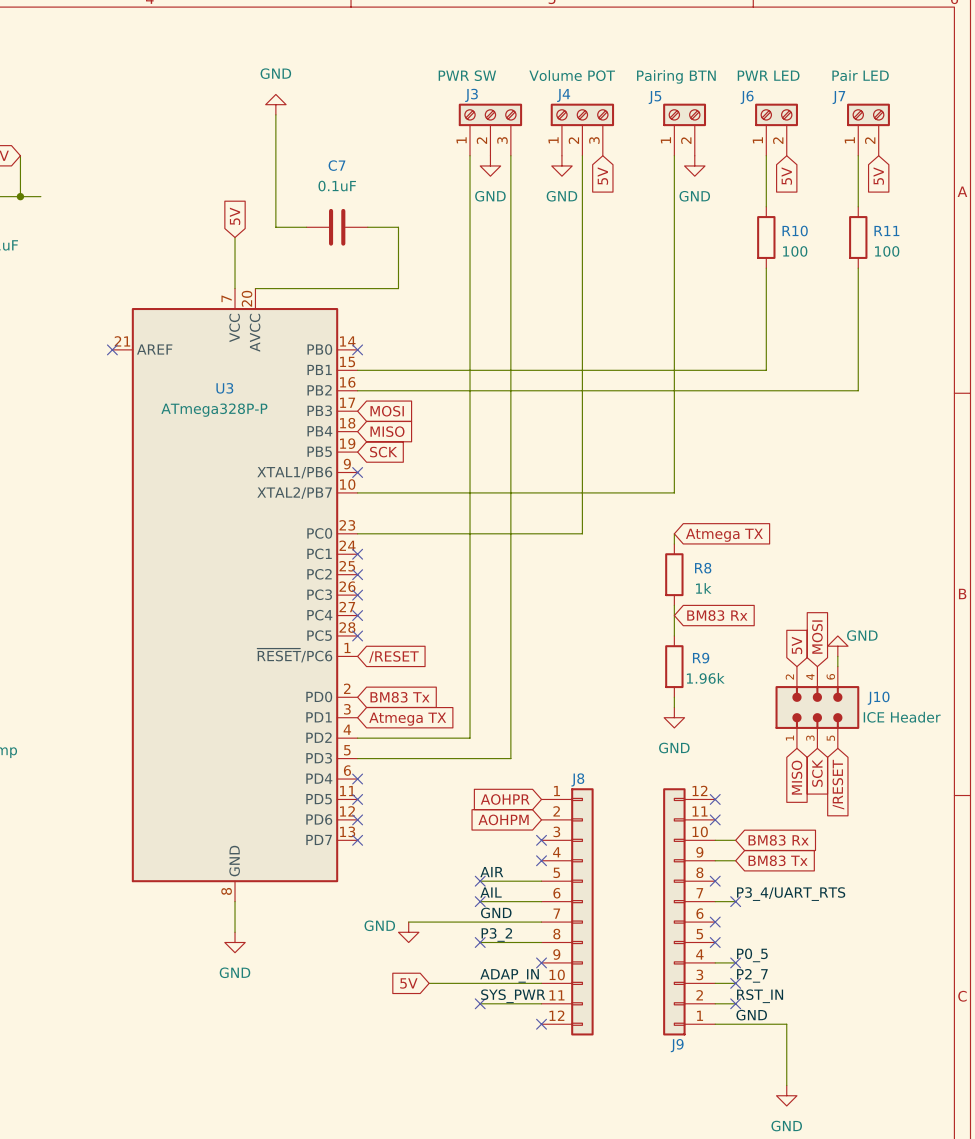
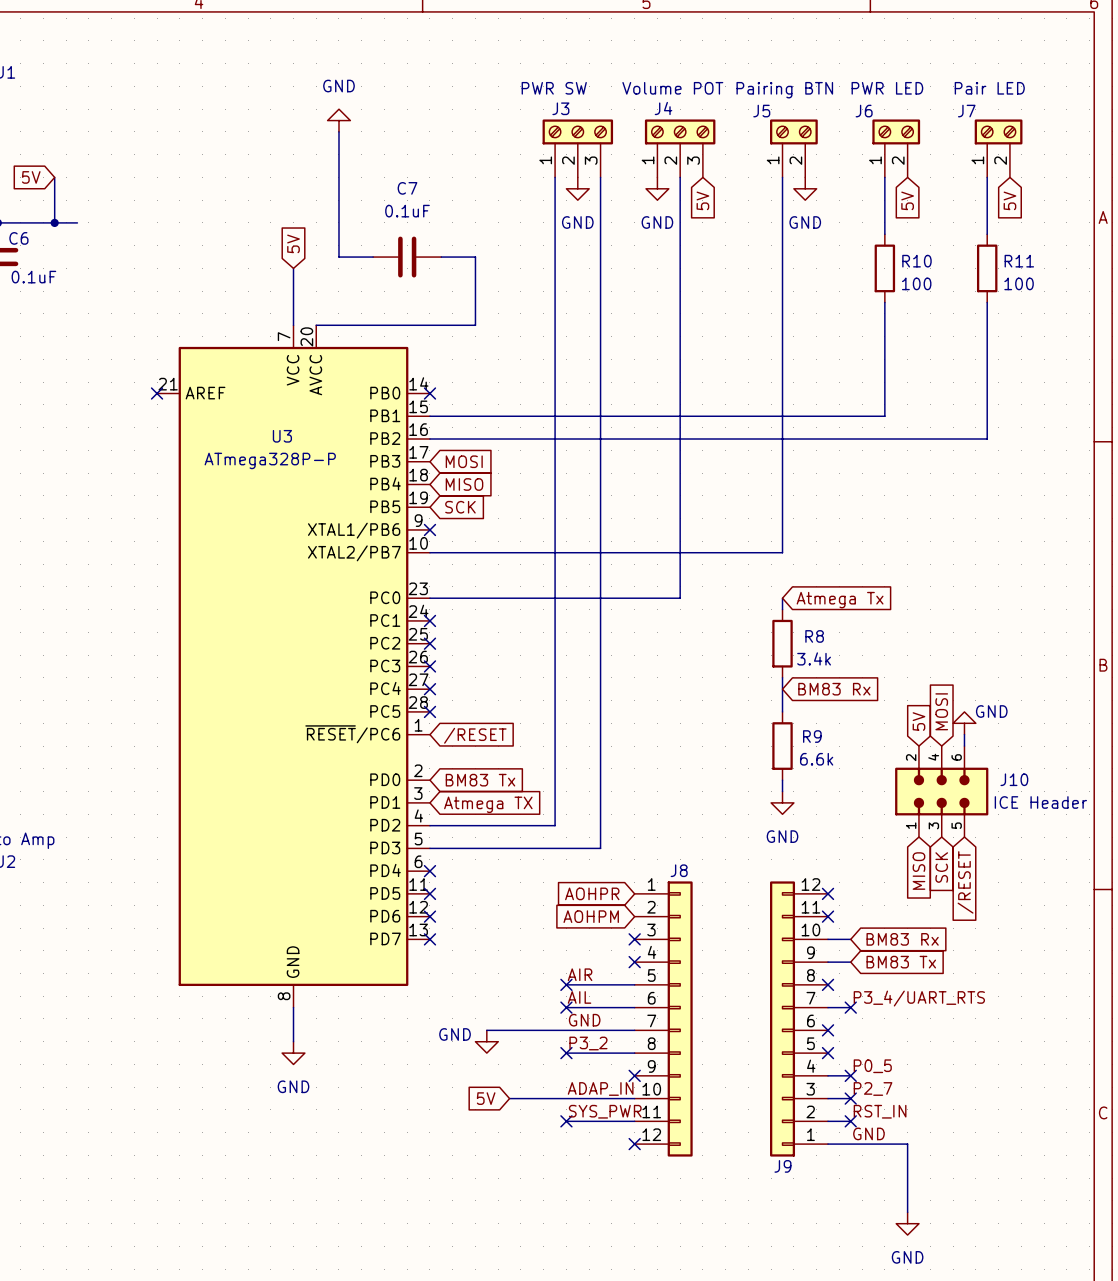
global label: Atmega TX (724, 535) -> Atmega Tx (840, 600)
R8 value: 1k (703, 588) -> 3.4k (814, 658)
R9 value: 1.96k (705, 678) -> 6.6k (816, 759)

